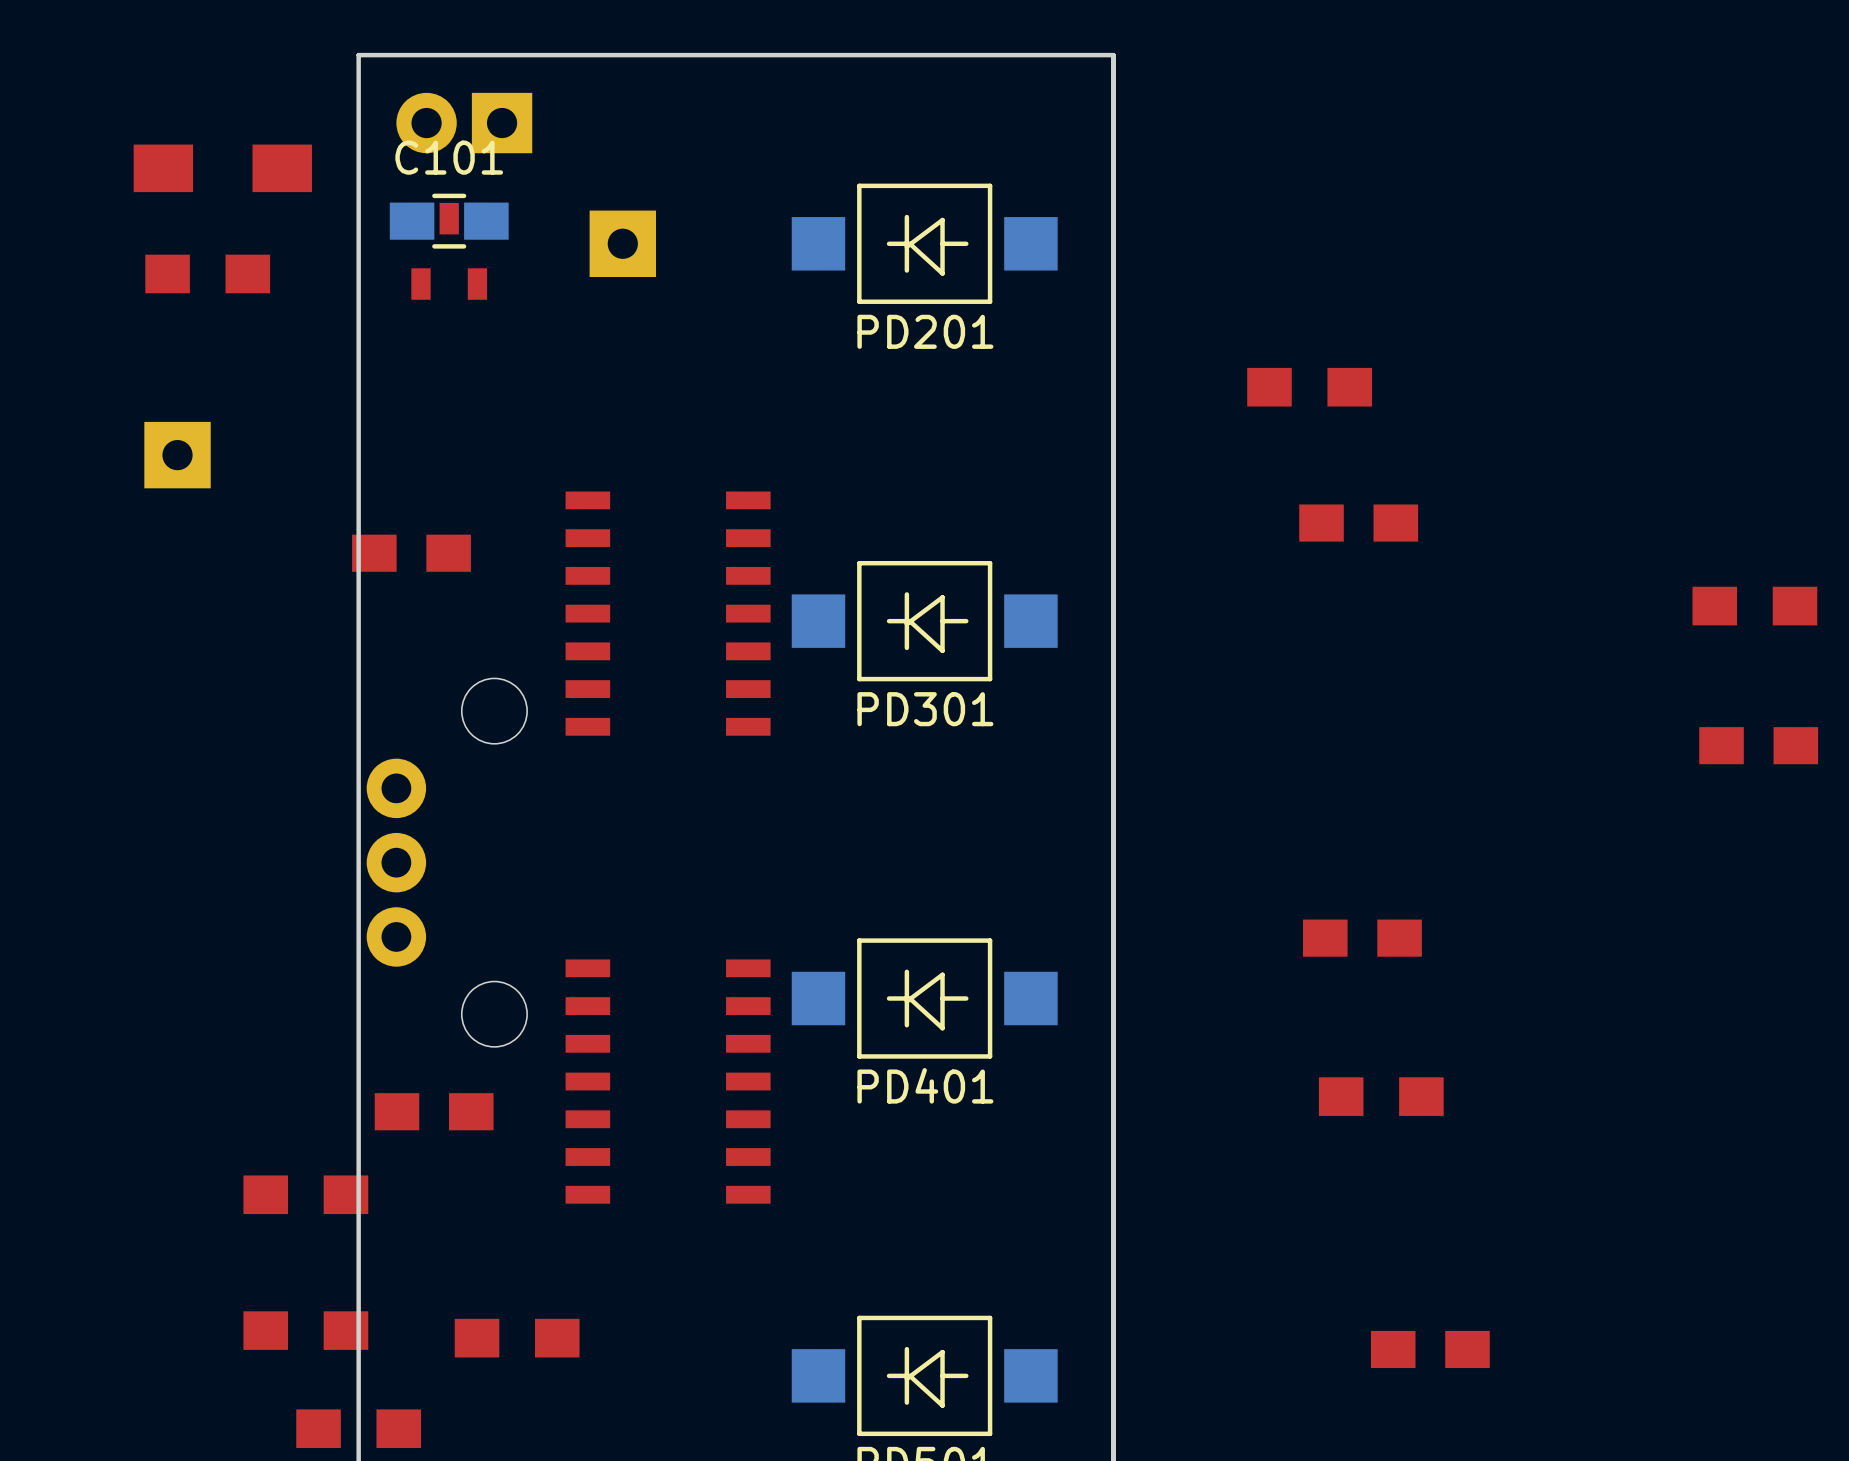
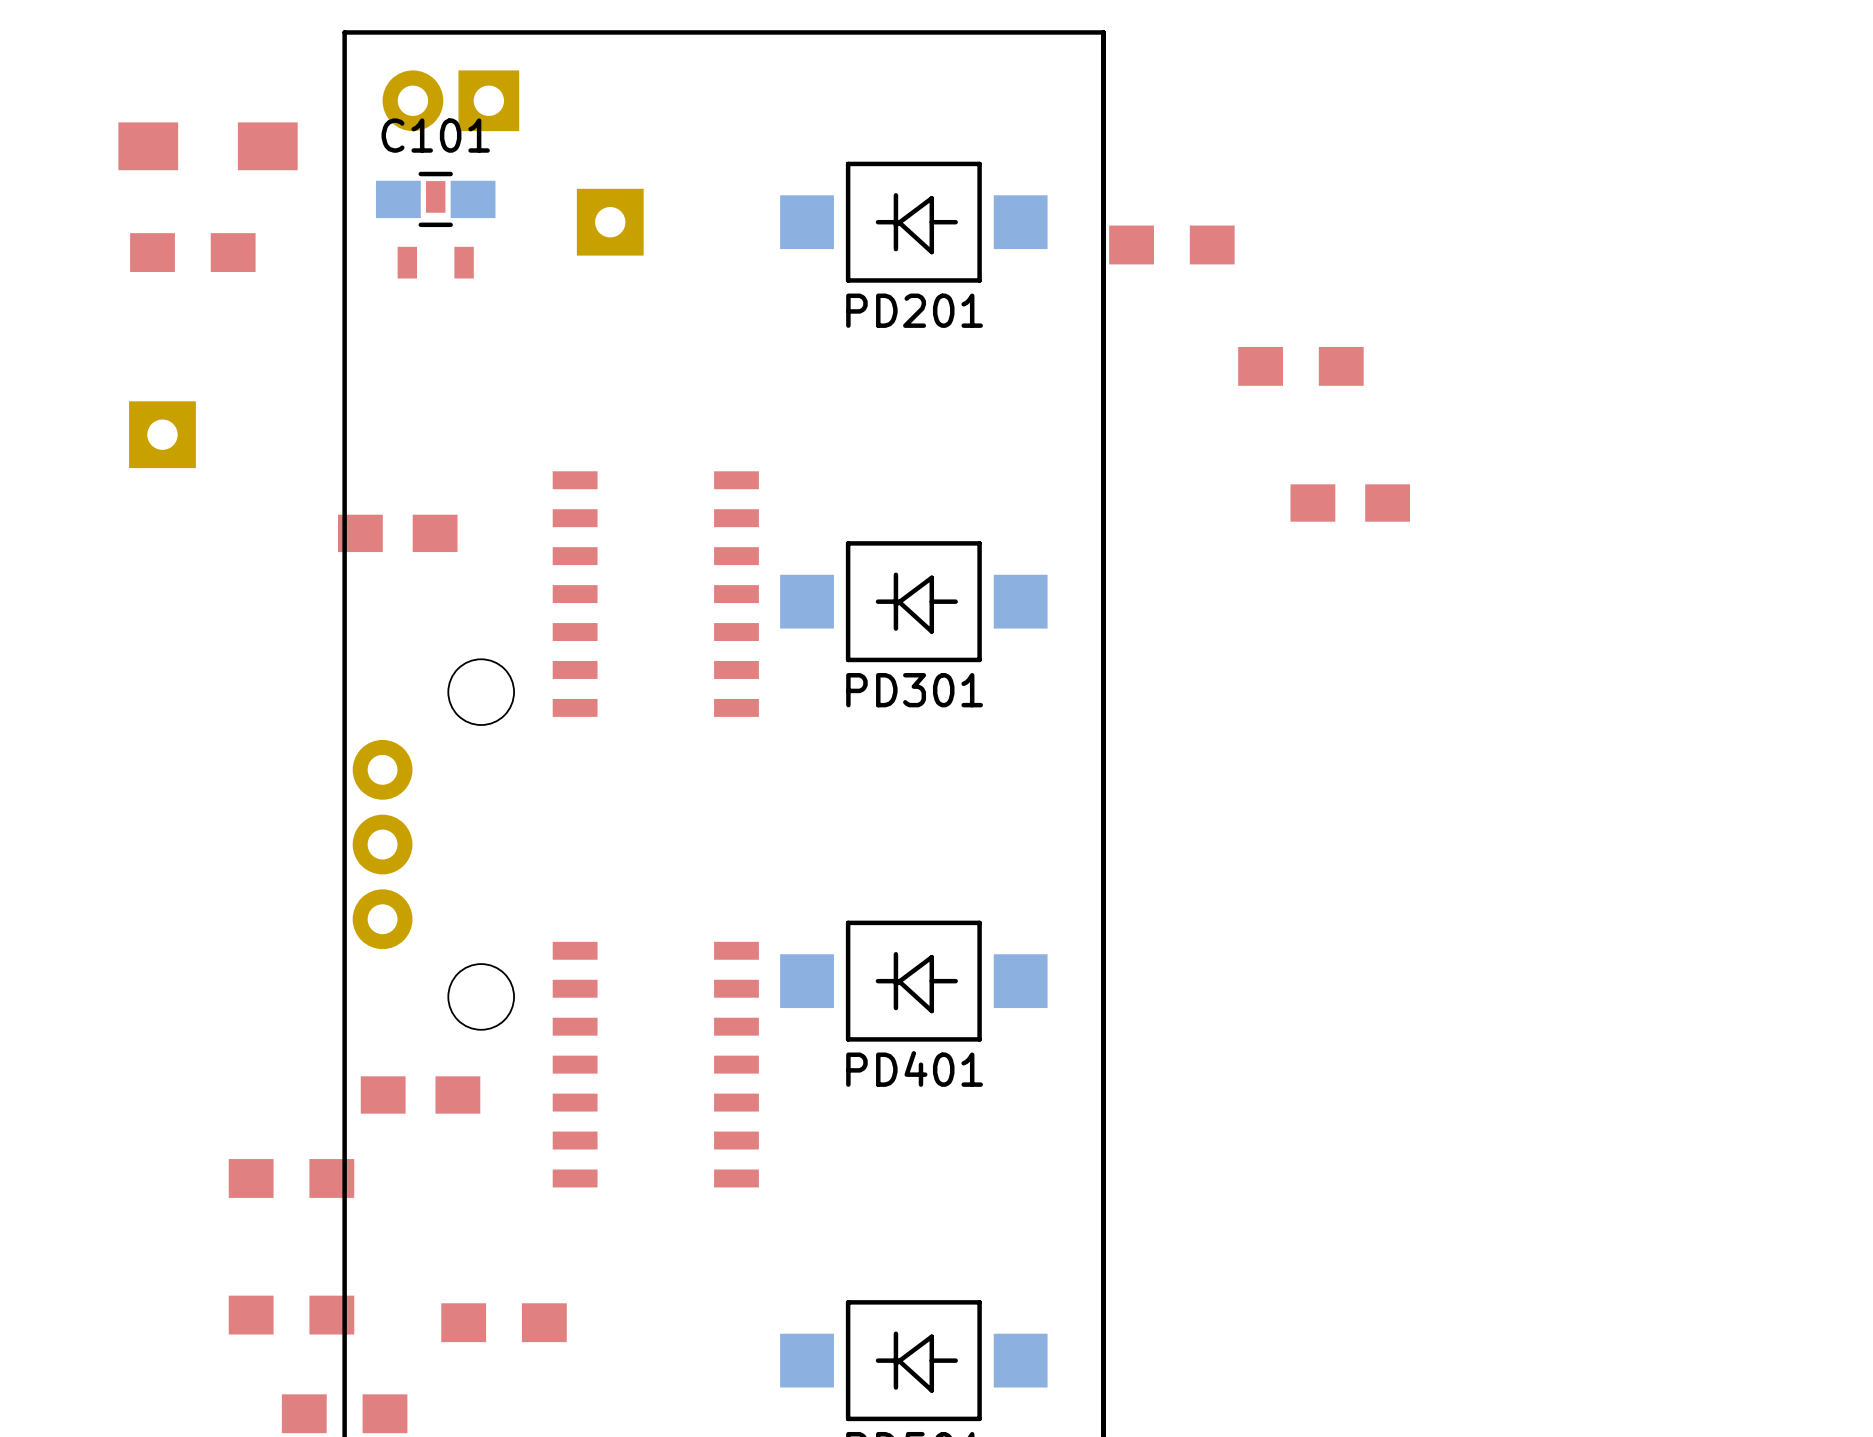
part: none -> (1171, 244)
part: (1754, 606) -> none
part: (1758, 745) -> none
part: (1362, 938) -> none
part: (1381, 1096) -> none
part: (1430, 1349) -> none

